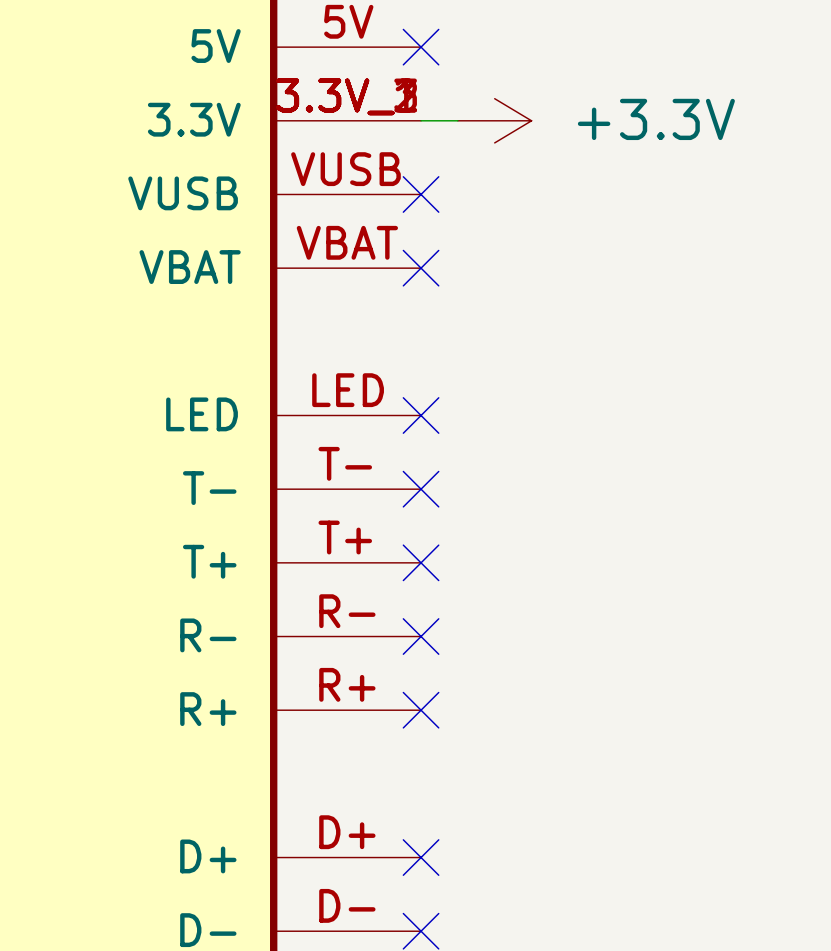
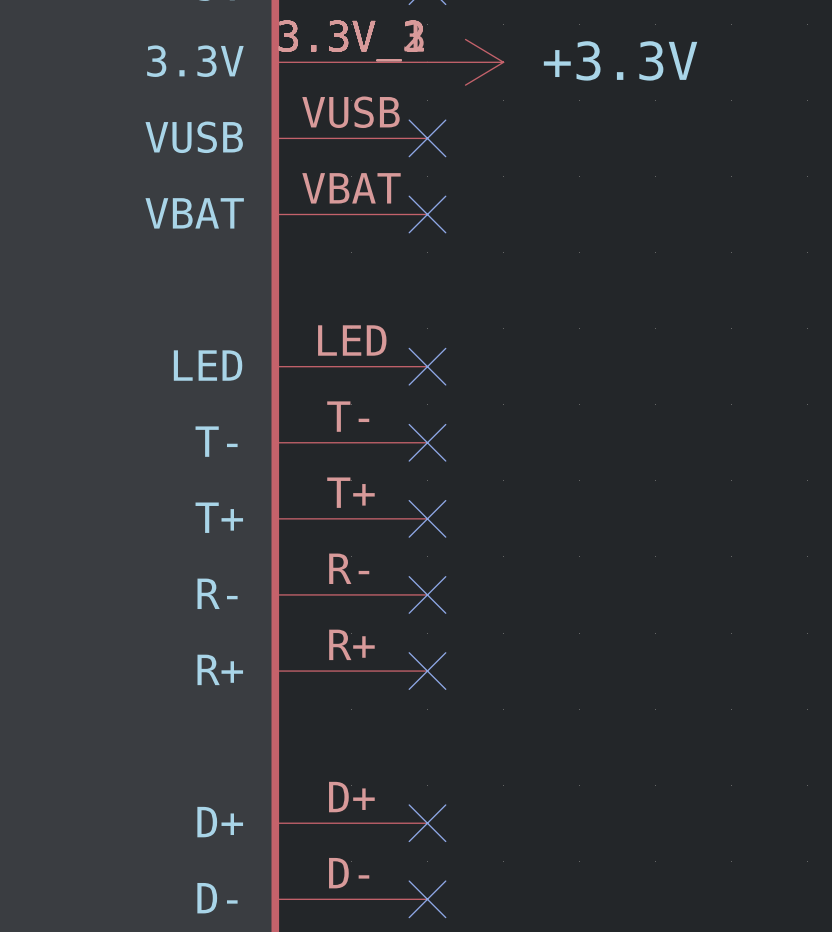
power symbol position: +3.3V (494, 120) -> +3.3V (465, 62)

